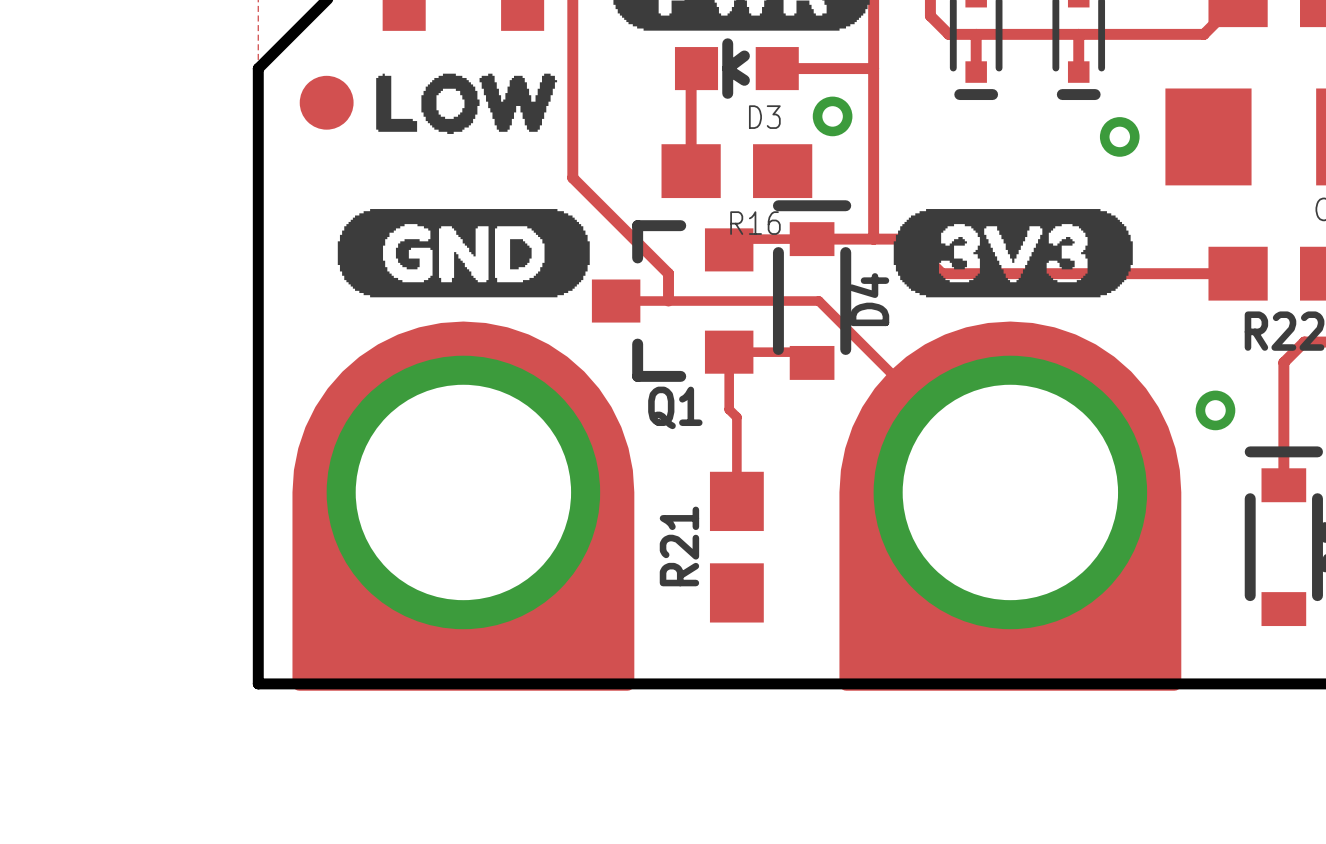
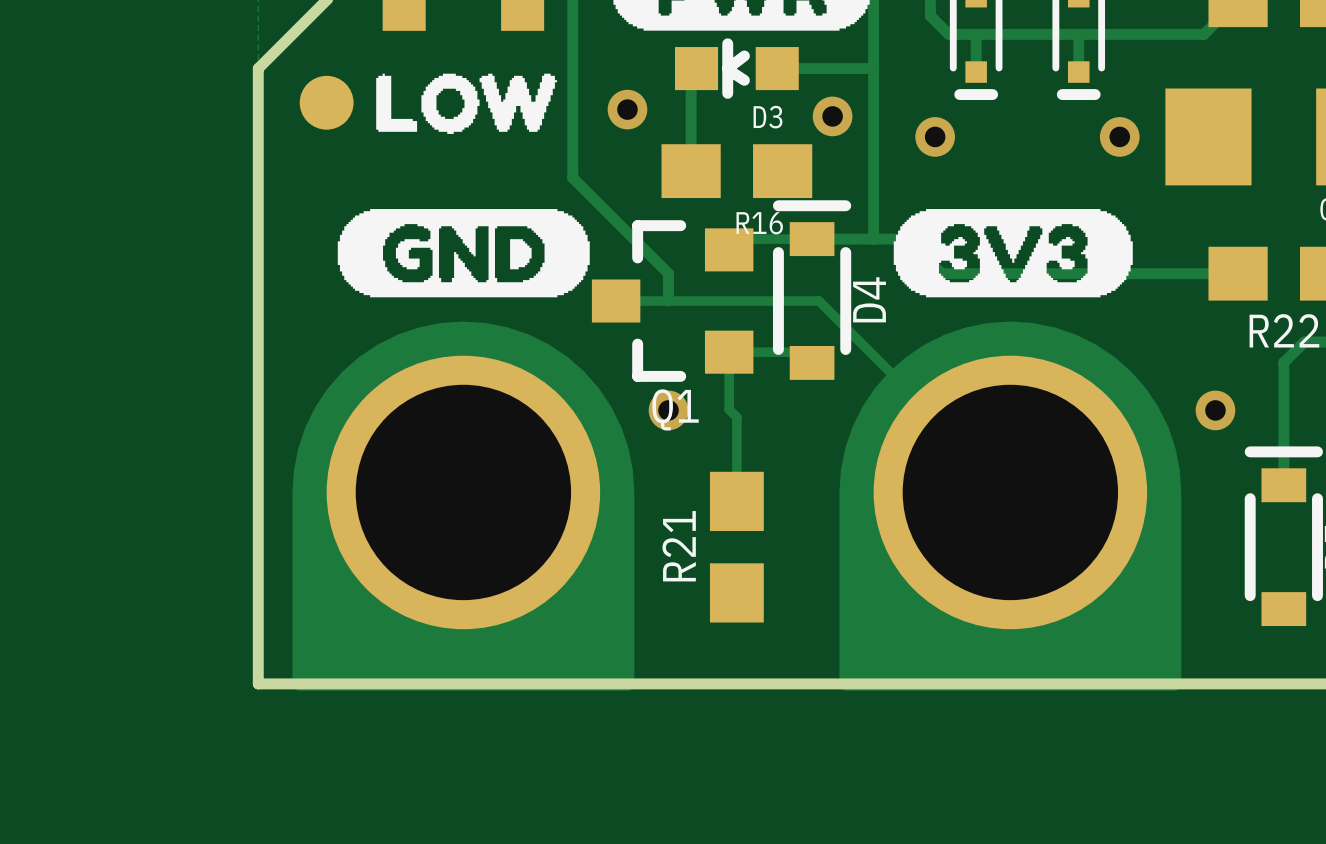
via: none -> (627, 109)
via: none -> (935, 136)
via: none -> (668, 410)

